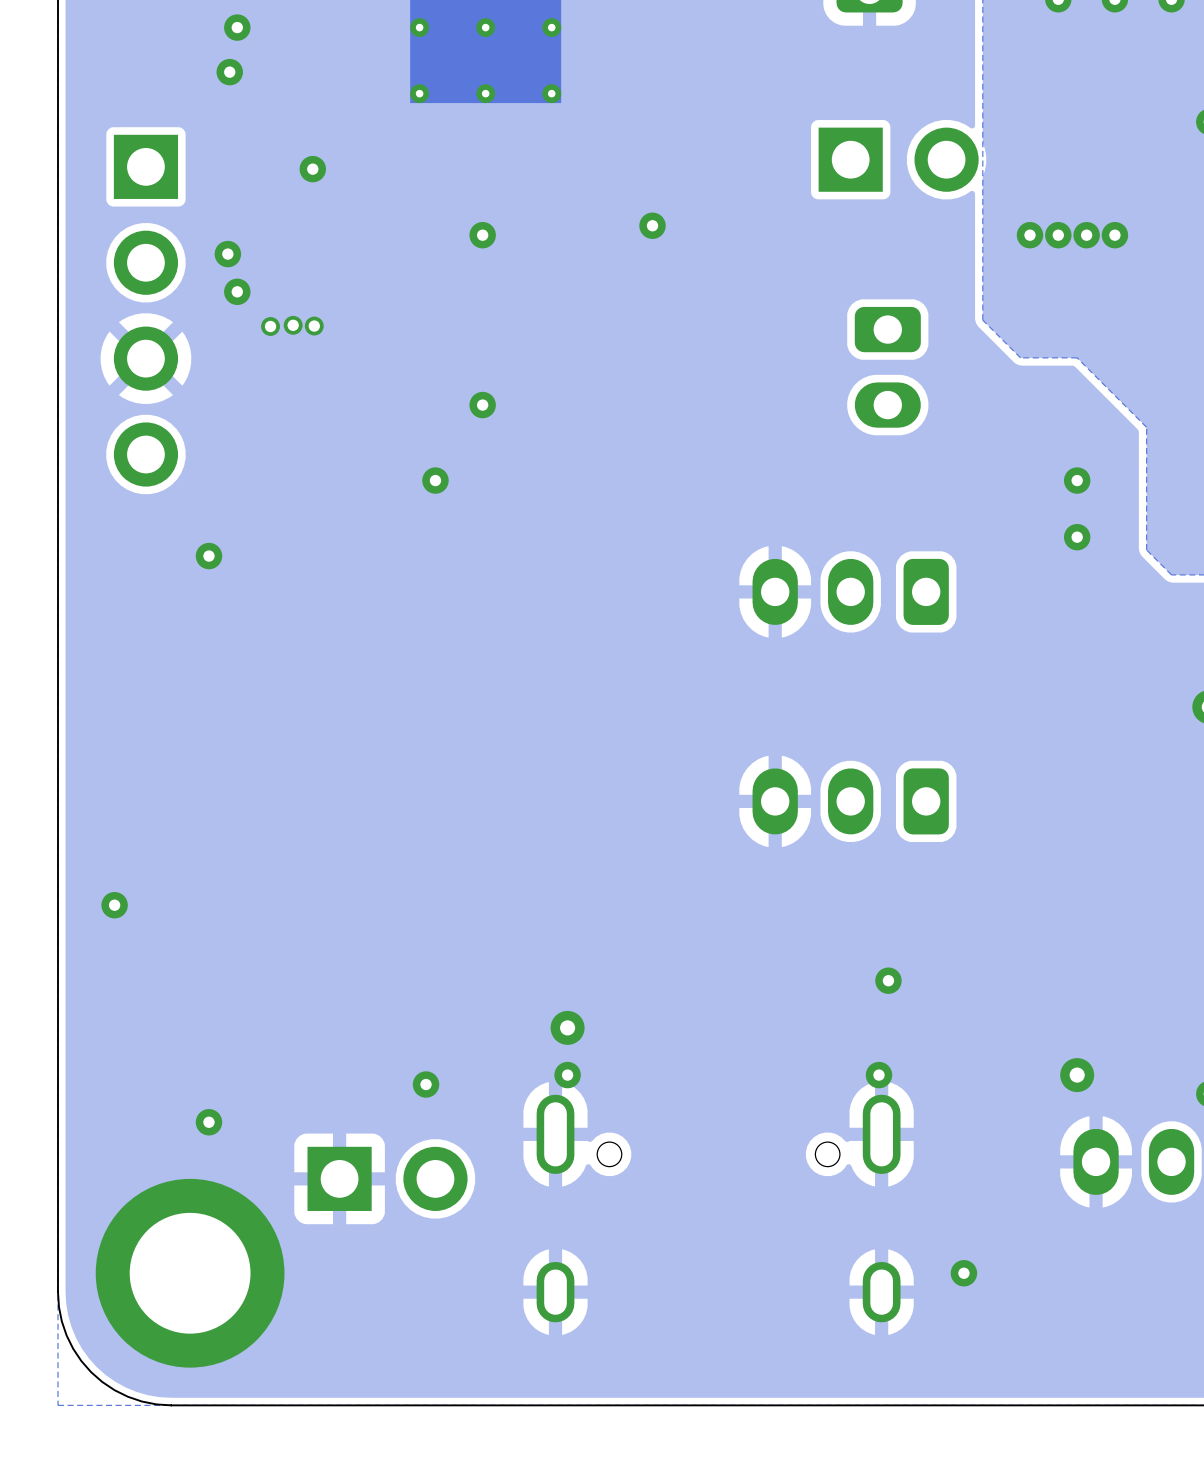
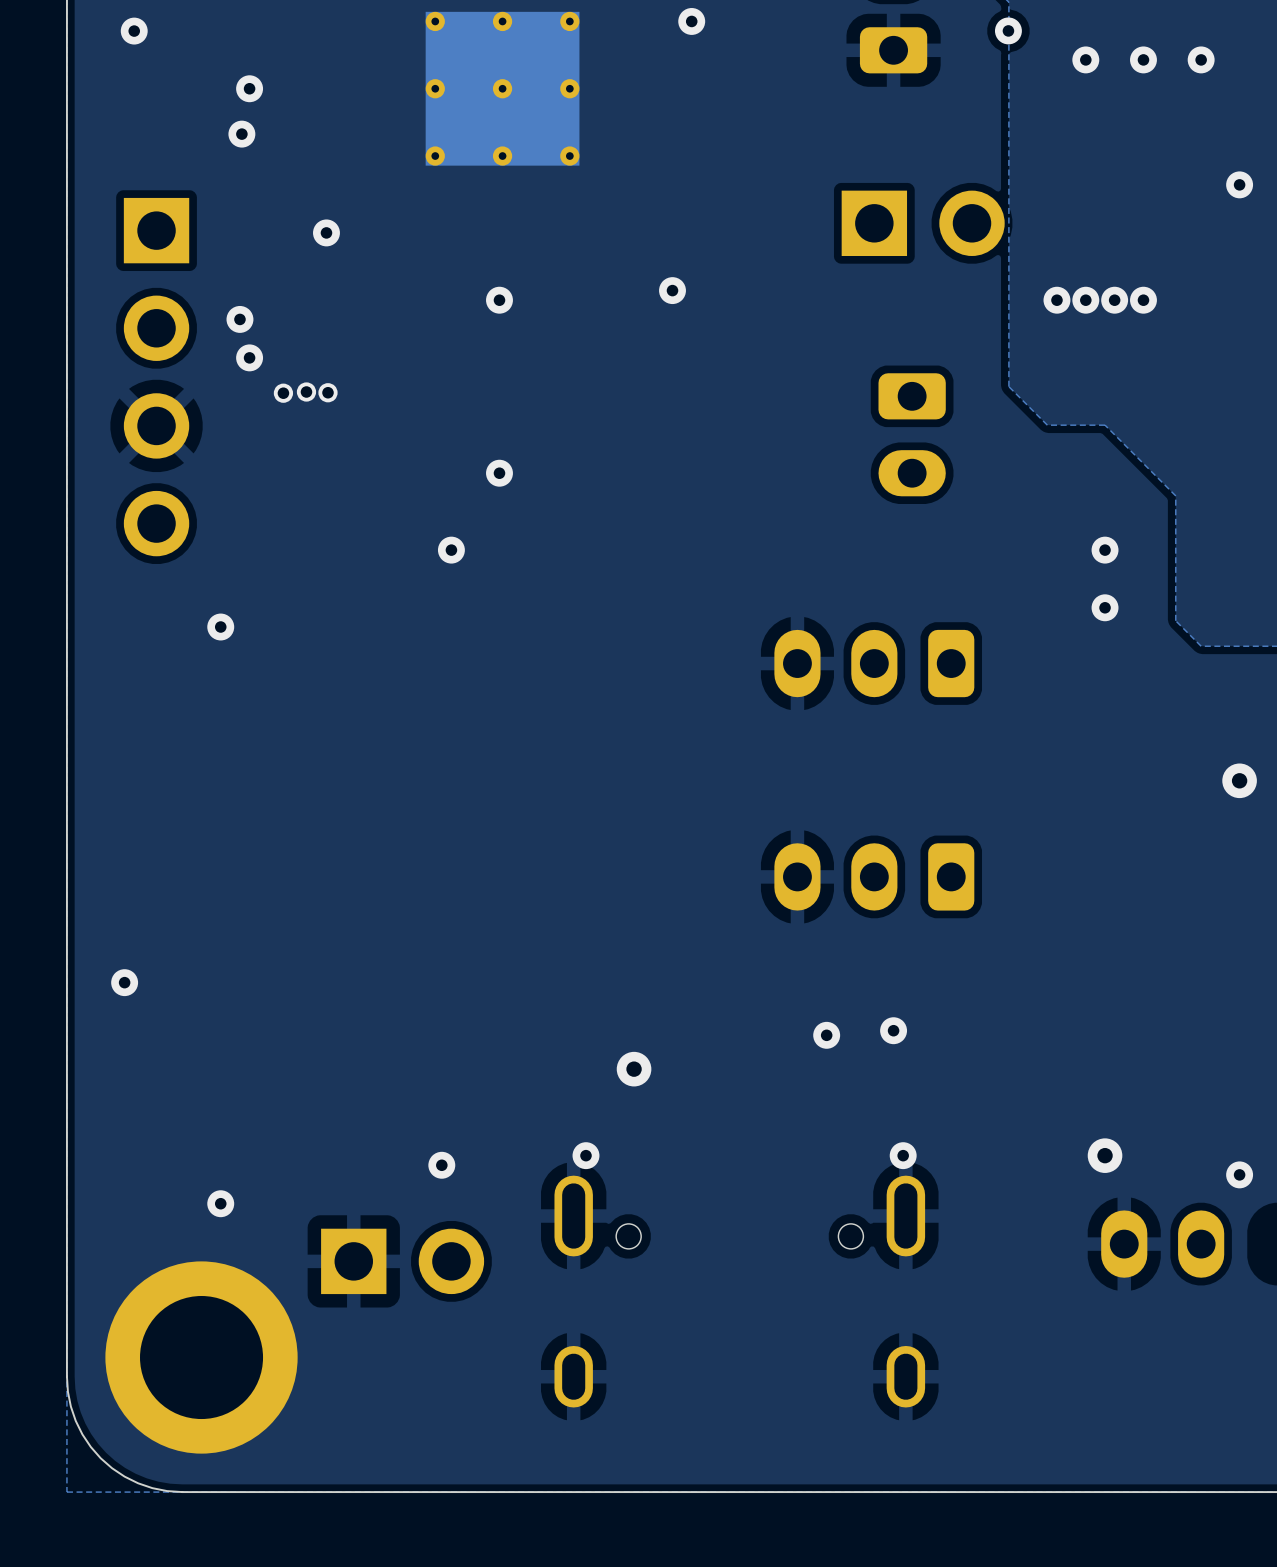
via: none -> (826, 1035)
via position: (888, 980) -> (893, 1030)
via position: (567, 1027) -> (634, 1069)
via: (963, 1273) -> none

